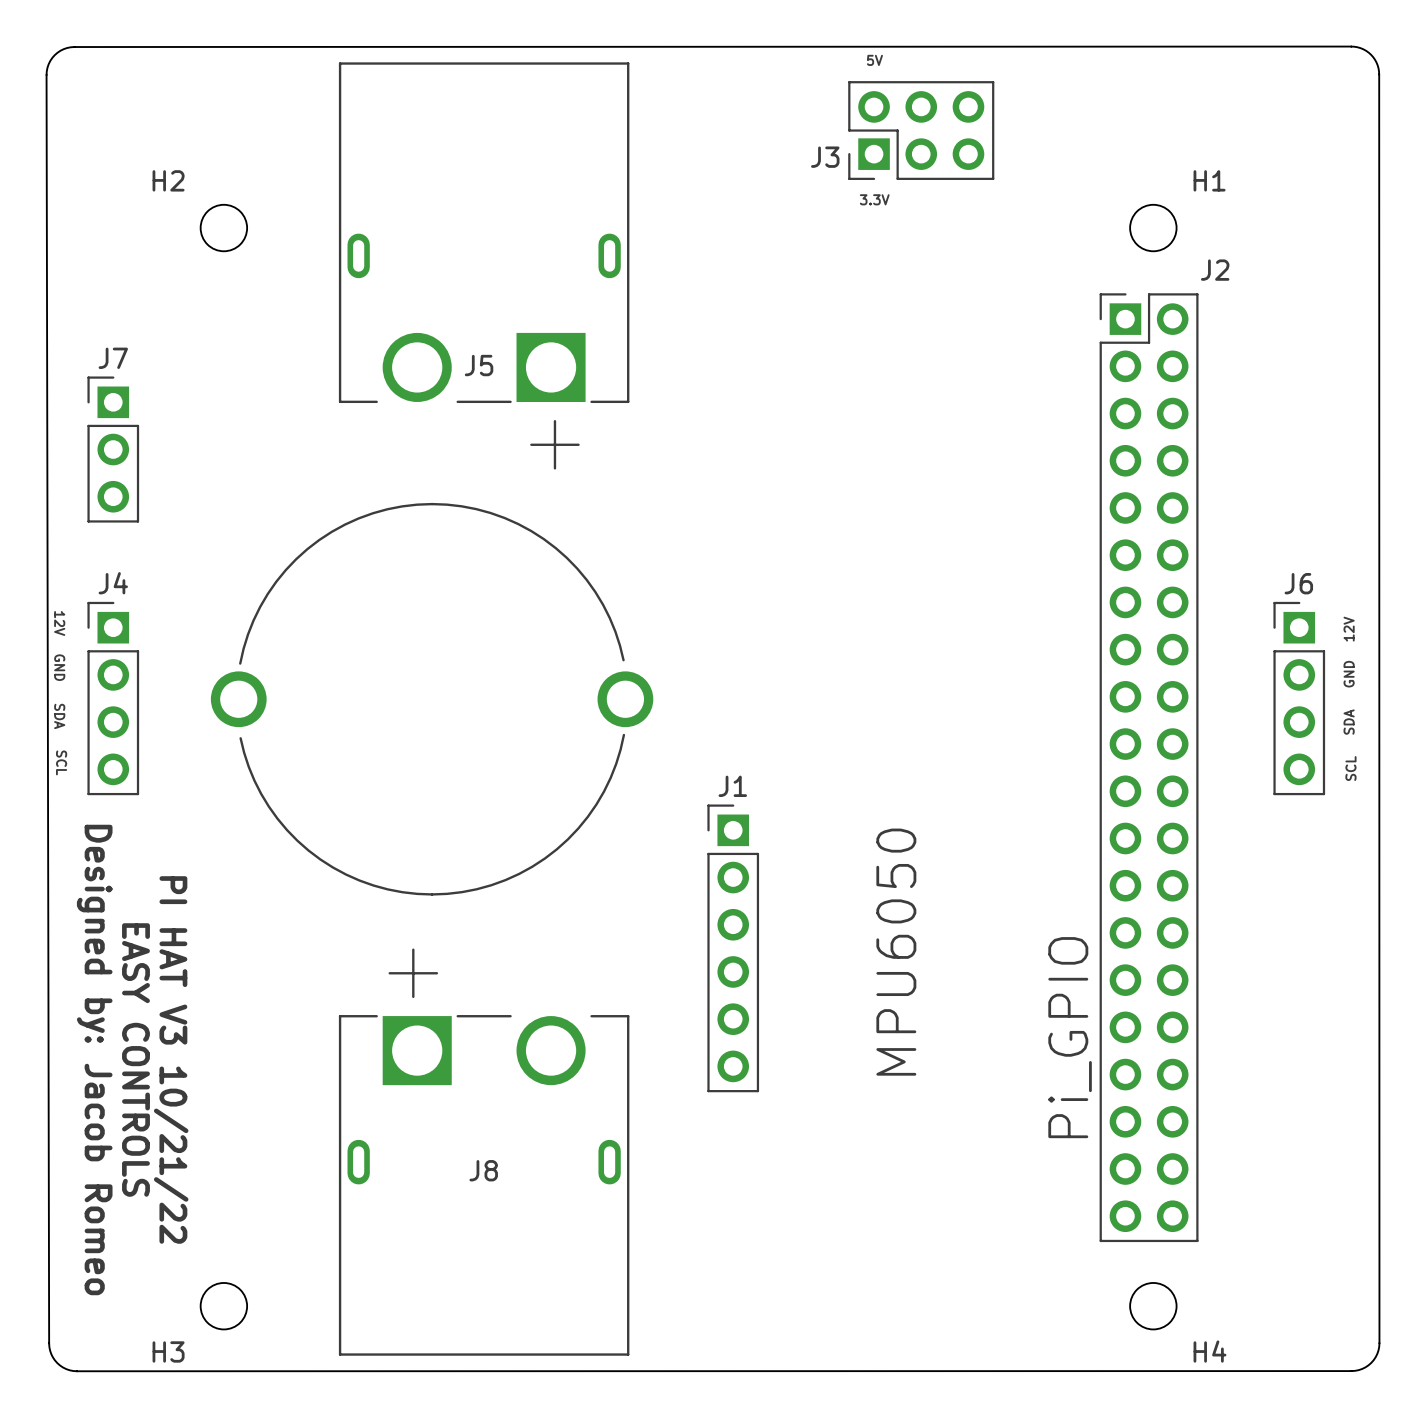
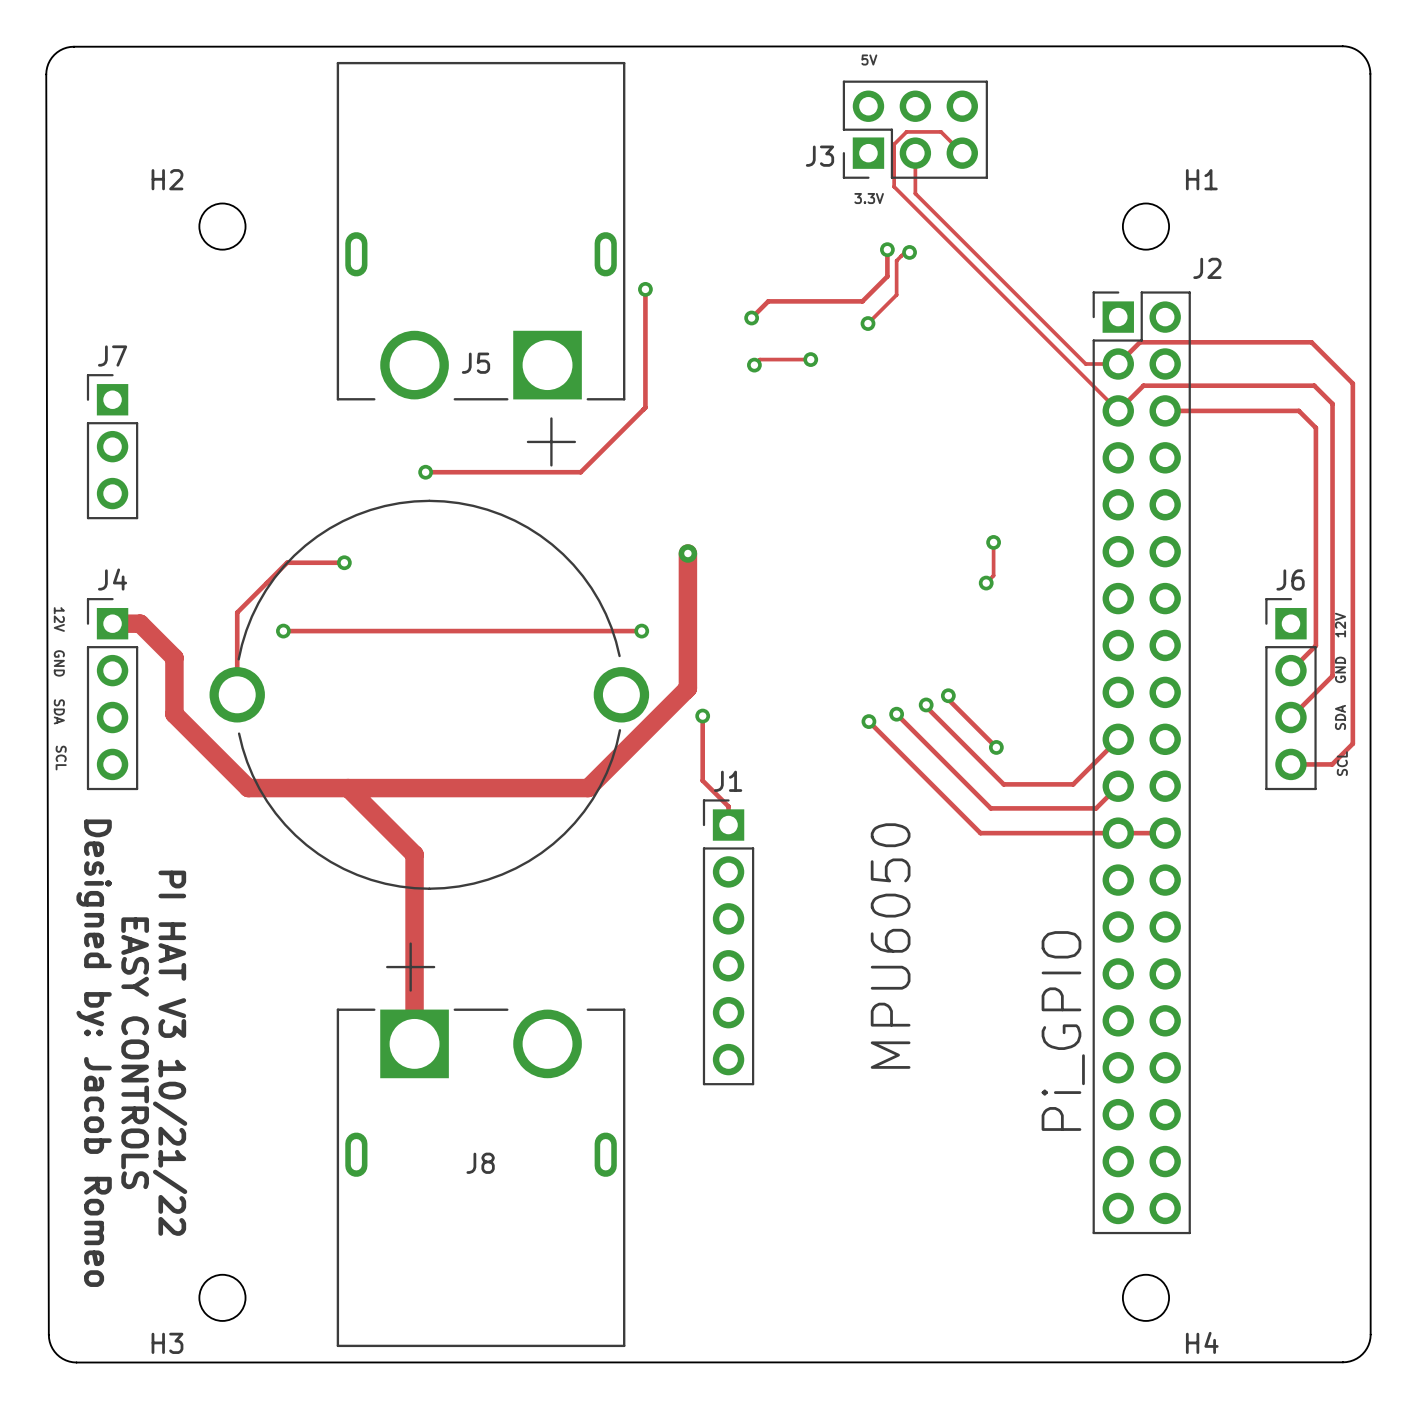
track: none -> (915, 153) (915, 193) (1085, 364) (1118, 364) (1139, 342) (1311, 342) (1352, 383) (1352, 743) (1332, 764) (1290, 764)
track: none -> (962, 153) (941, 131) (906, 131) (894, 144) (894, 186) (1118, 410) (1143, 385) (1314, 385) (1332, 403) (1332, 675) (1290, 717)
track: none -> (887, 249) (887, 276) (862, 301)
via: none -> (887, 249)
track: none -> (909, 252) (904, 252) (896, 260) (896, 294) (868, 323)
via: none -> (909, 252)
track: none -> (645, 289) (645, 407) (580, 472) (425, 472)
via: none -> (645, 289)
track: none -> (862, 301) (768, 301) (751, 318)
via: none -> (751, 318)
via: none -> (868, 323)
track: none -> (810, 359) (759, 359) (754, 365)
via: none -> (810, 359)
via: none -> (754, 365)
track: none -> (1165, 410) (1298, 410) (1315, 427) (1315, 645) (1290, 670)
via: none -> (425, 472)
track: none -> (993, 542) (993, 575) (986, 583)
via: none -> (993, 542)
track: none -> (687, 553) (687, 688) (588, 788) (248, 788) (174, 714) (174, 657) (140, 623) (112, 623)
via: none -> (687, 553)
track: none -> (344, 562) (287, 562) (237, 612) (237, 694)
via: none -> (344, 562)
via: none -> (986, 583)
track: none -> (283, 631) (641, 631)
via: none -> (283, 631)
via: none -> (641, 631)
track: none -> (948, 695) (948, 699) (996, 747)
via: none -> (948, 695)
track: none -> (926, 704) (1003, 784) (1073, 784) (1118, 739)
via: none -> (926, 704)
track: none -> (896, 714) (990, 808) (1096, 808) (1118, 786)
via: none -> (896, 714)
track: none -> (702, 716) (702, 780) (728, 806) (728, 825)
via: none -> (702, 716)
track: none -> (868, 721) (980, 833) (1165, 833)
via: none -> (868, 721)
via: none -> (996, 747)
track: none -> (348, 788) (414, 854) (414, 1043)

